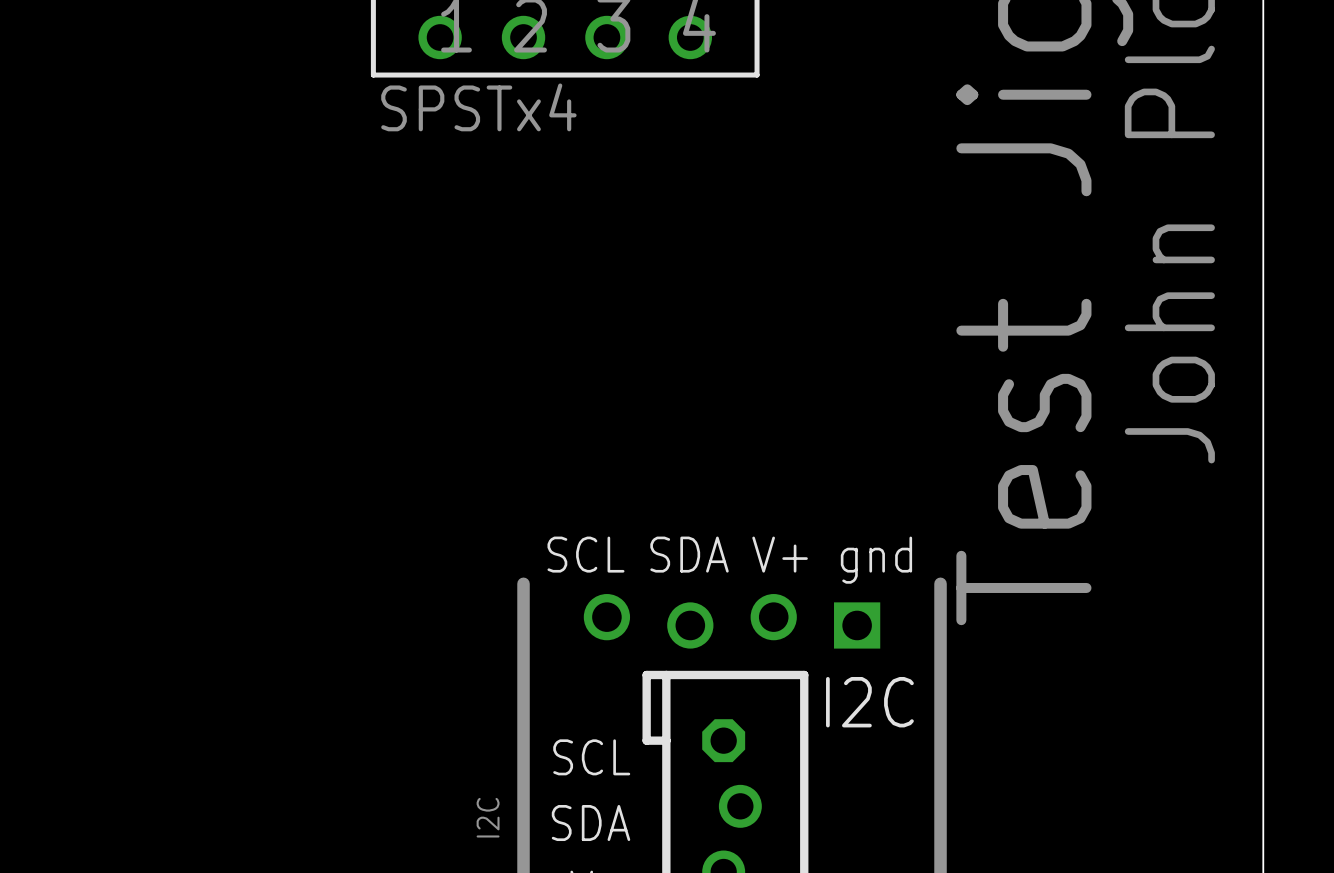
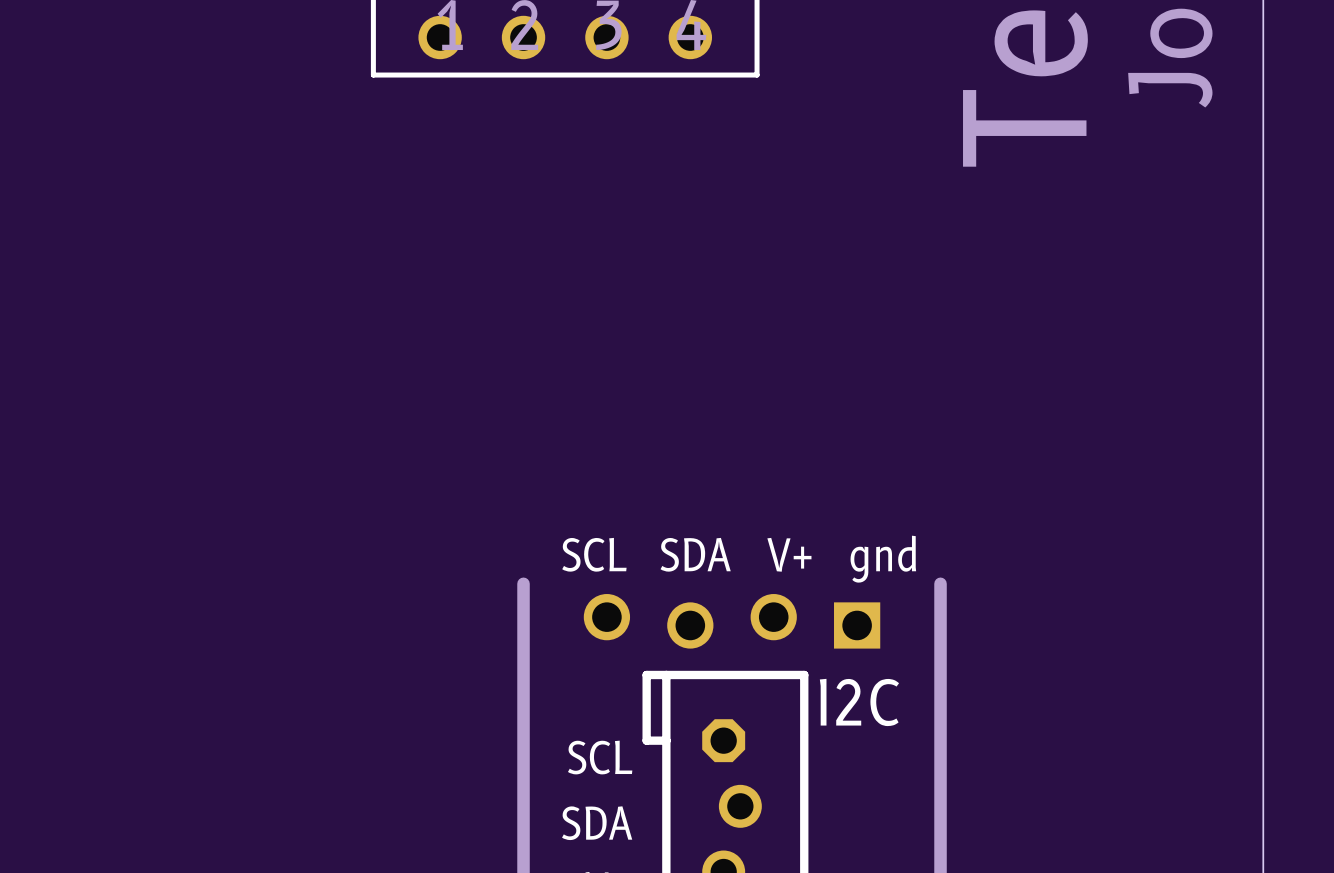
part value: SPSTx4 (478, 107) -> none
part value: I2C (488, 817) -> none

